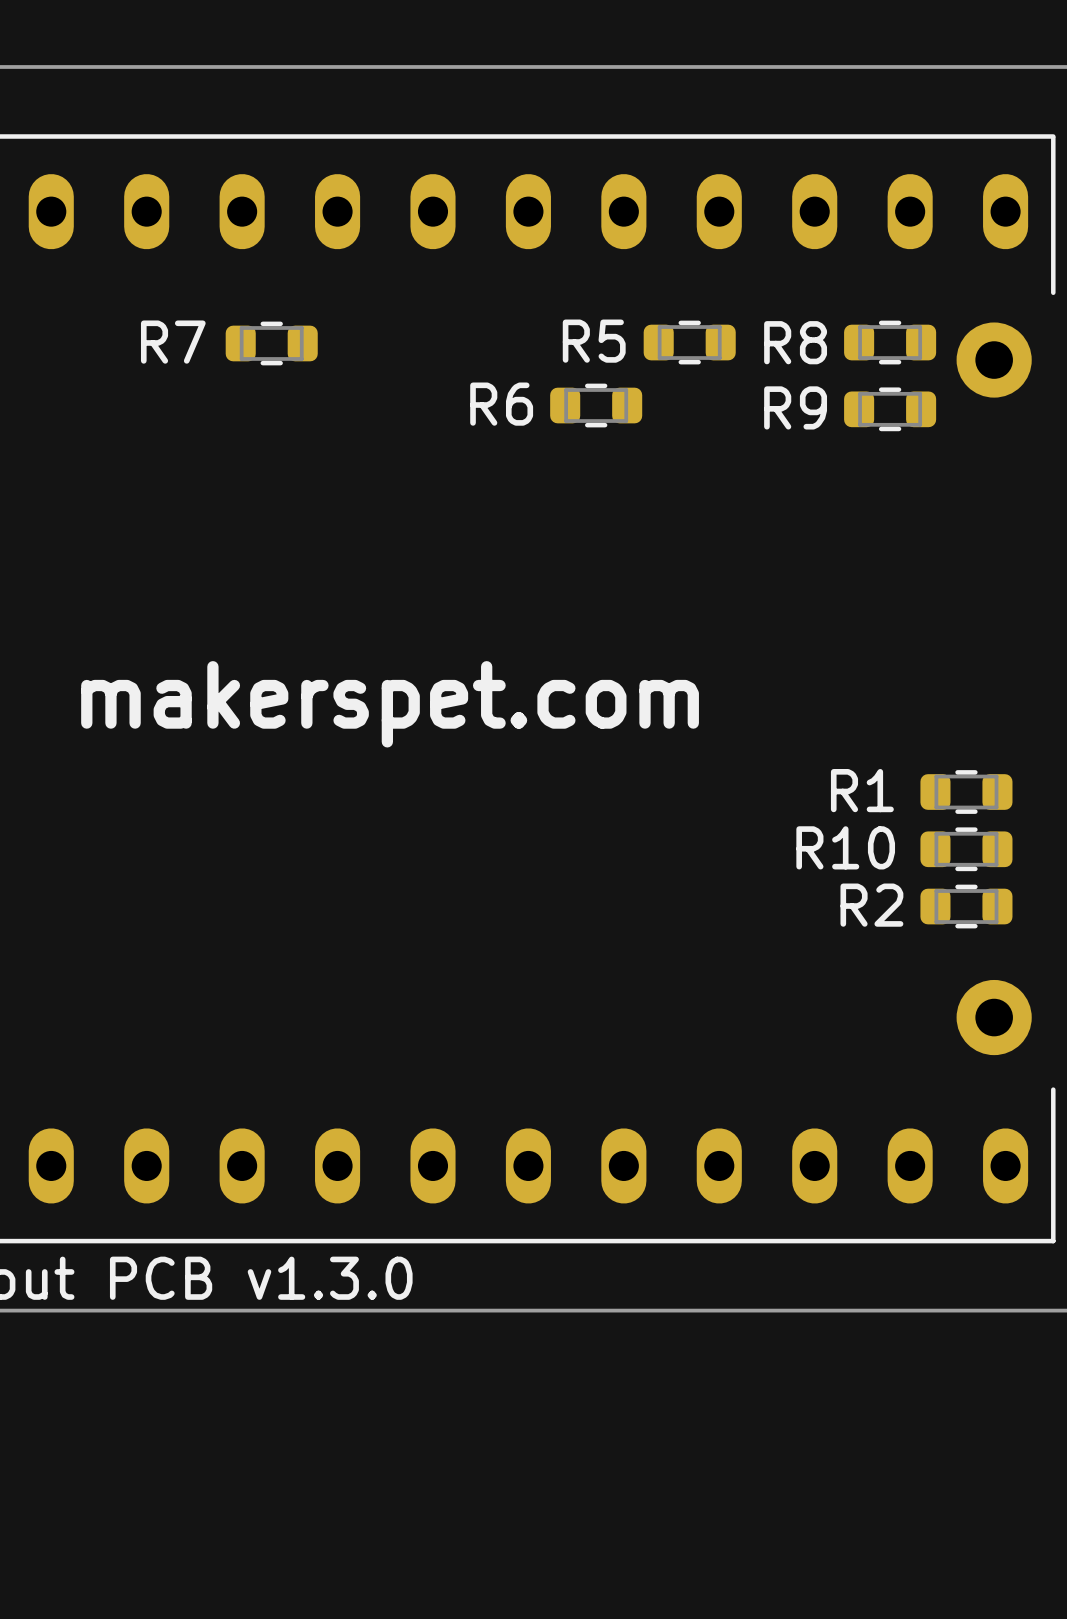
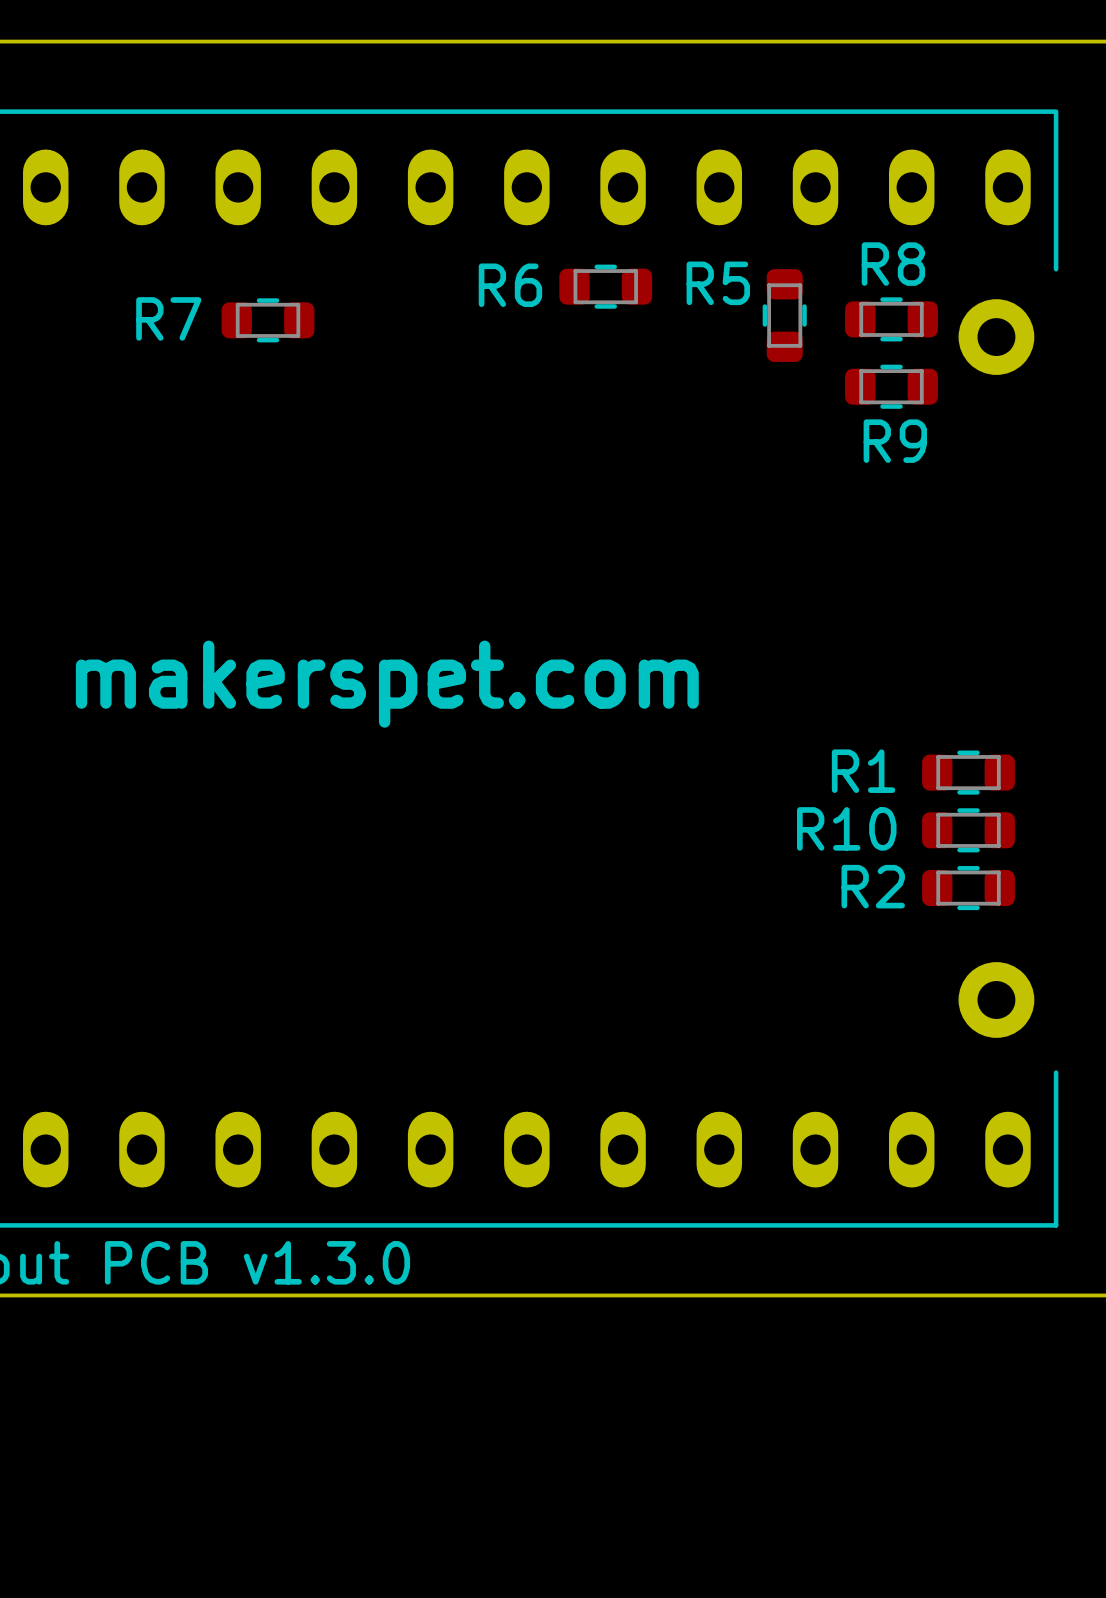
R5 rotation: 0° (689, 342) -> 90° clockwise (784, 315)
R5 position: (689, 342) -> (784, 315)
R8 name position: R8 (795, 342) -> R8 (893, 264)
R6 position: (596, 405) -> (605, 286)
R9 name position: R9 (795, 407) -> R9 (895, 441)

